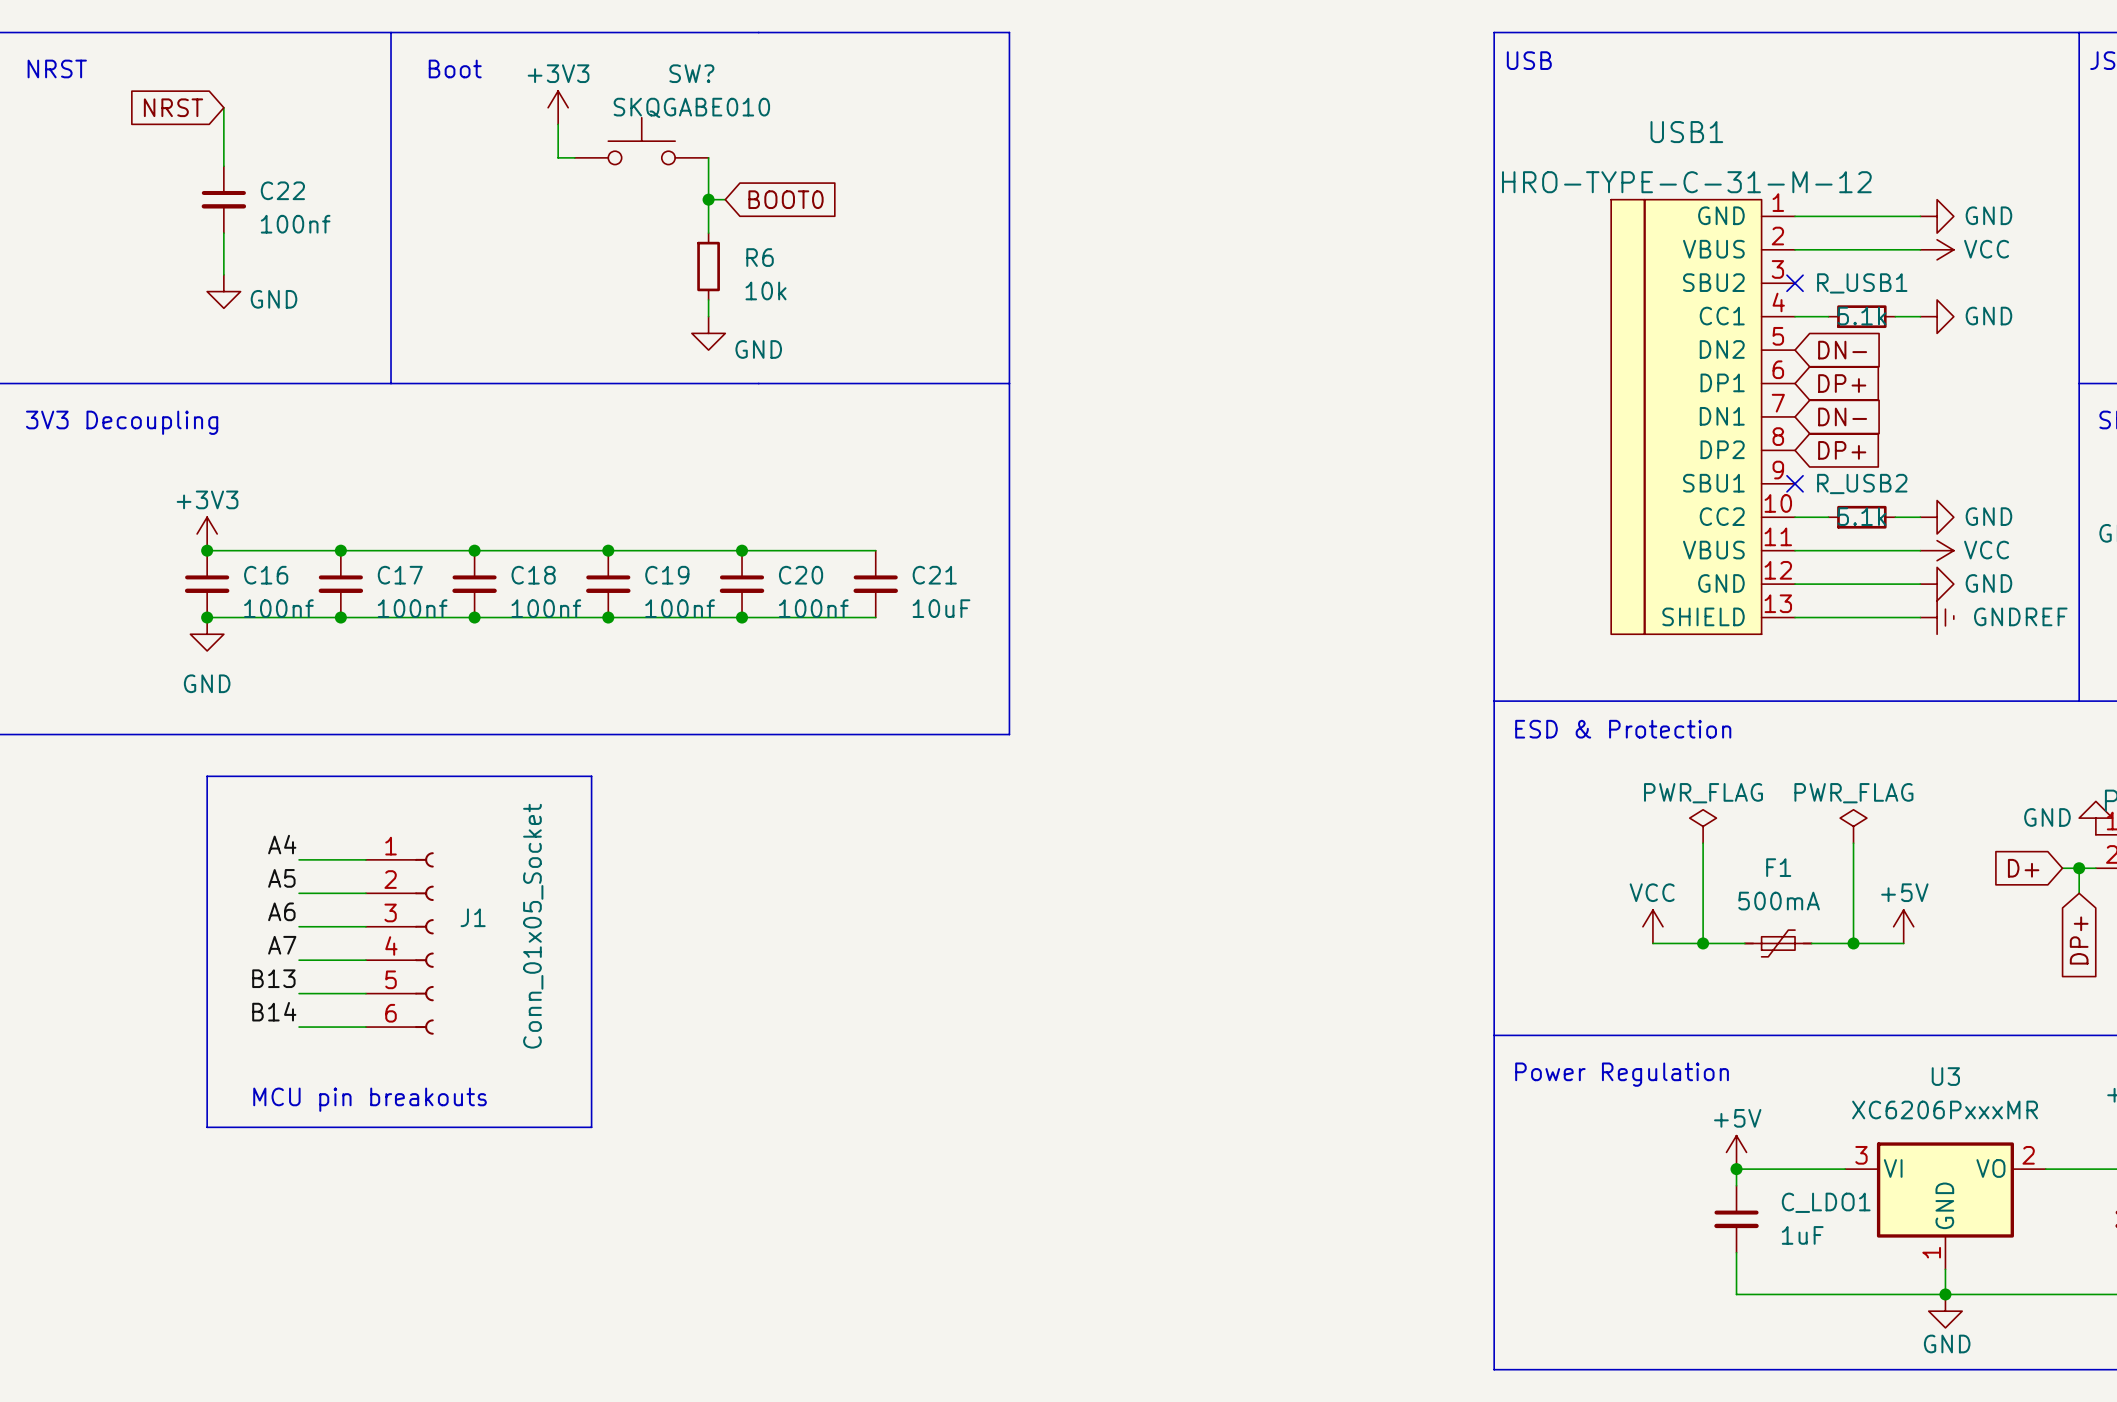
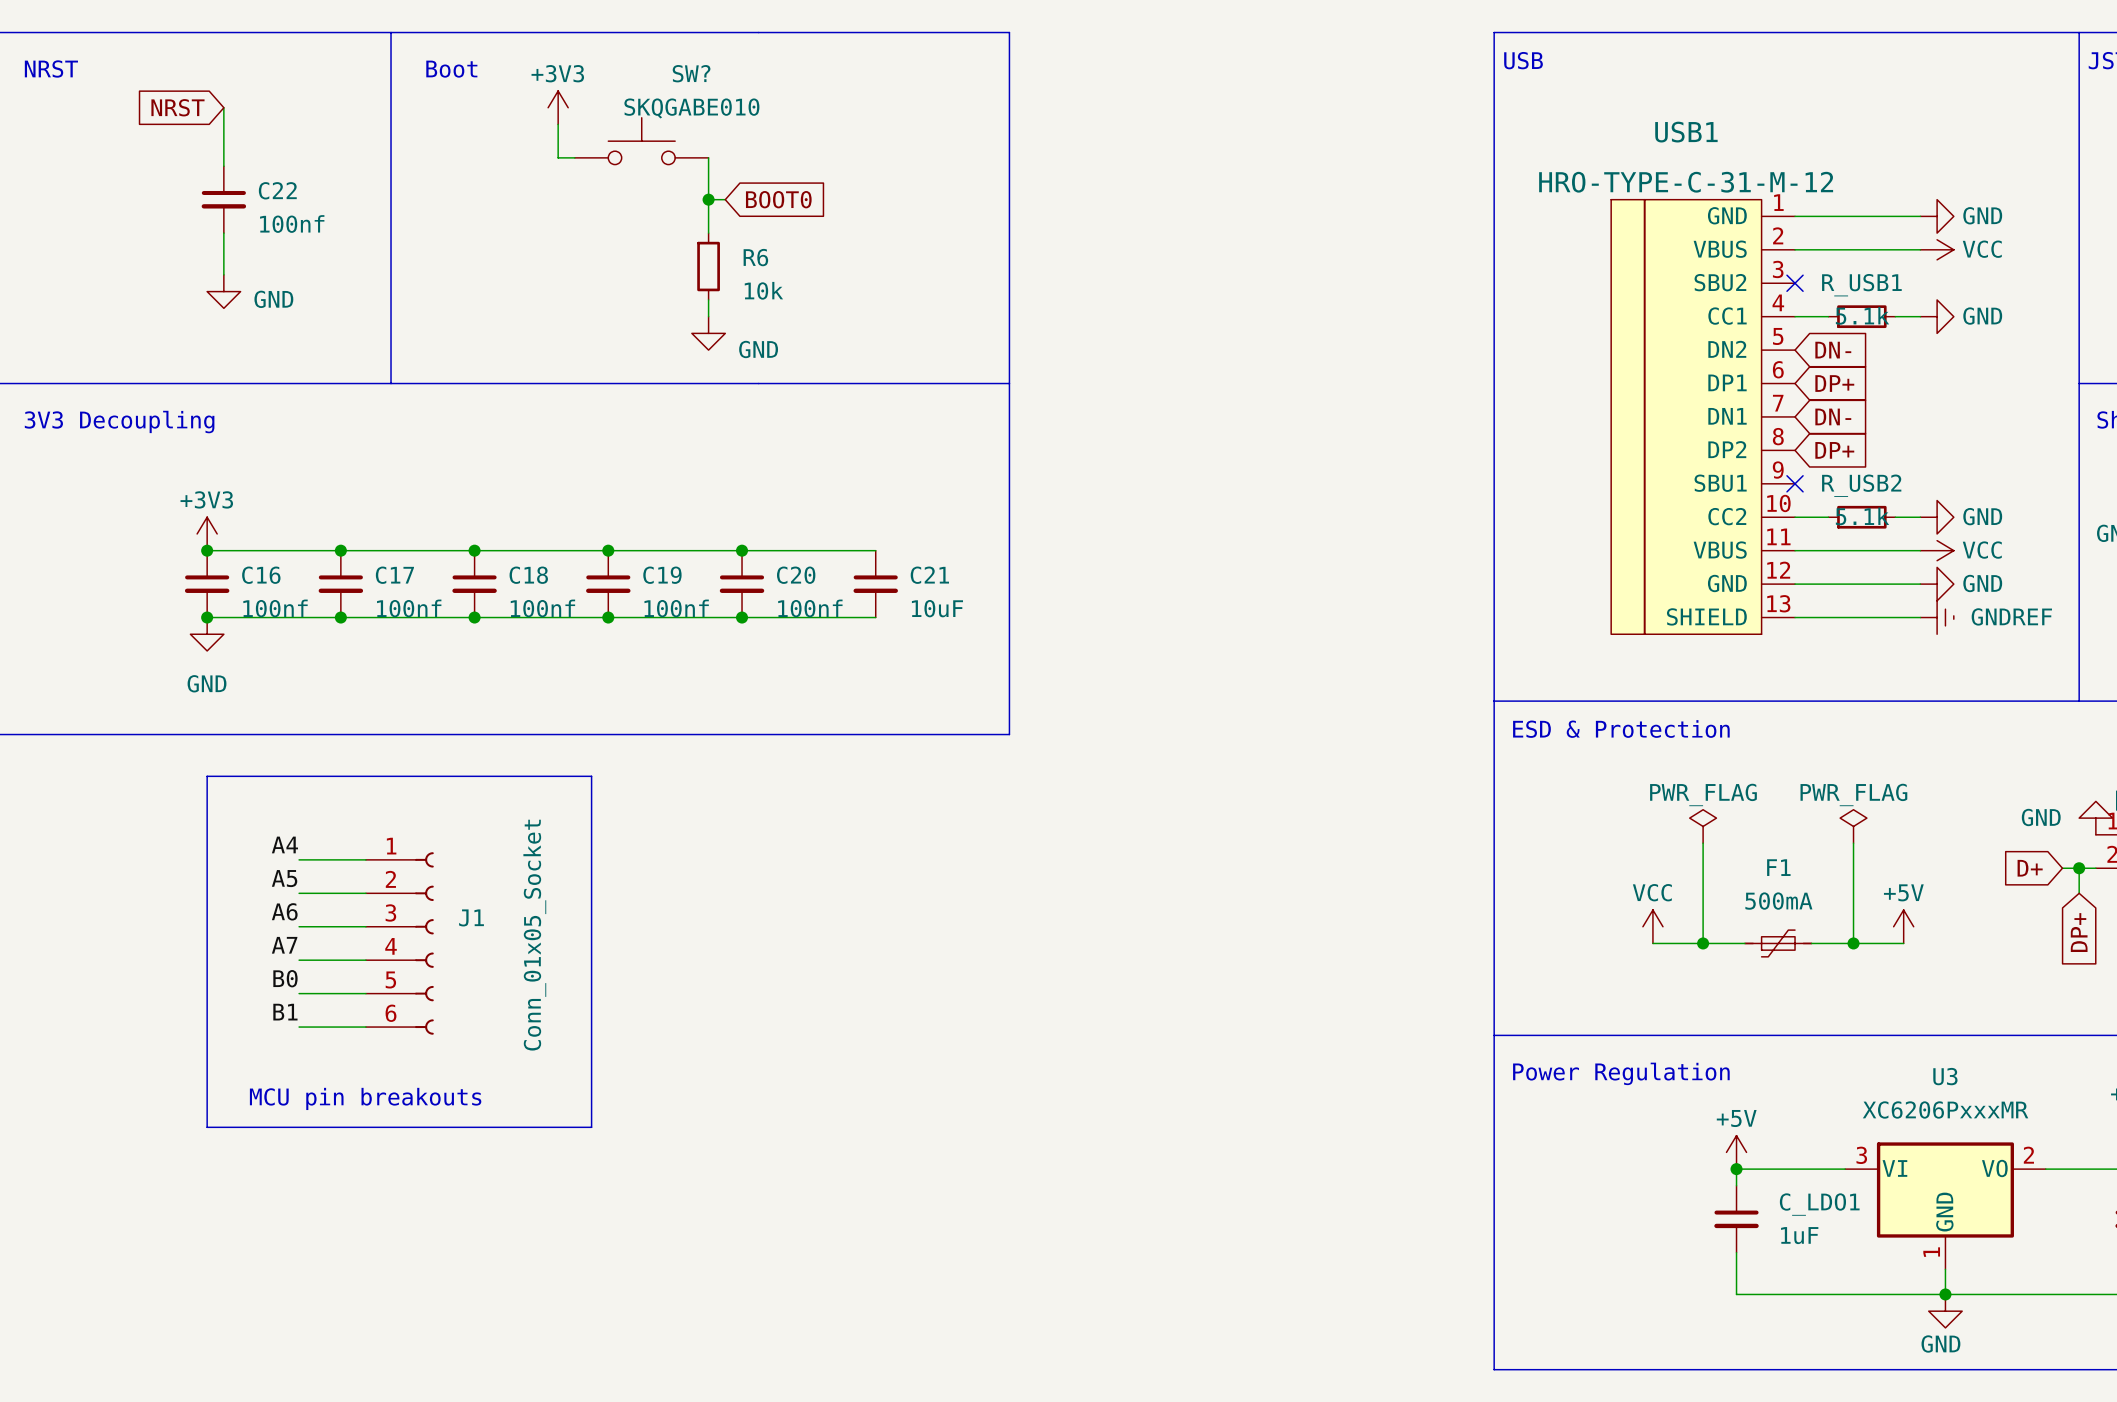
label: B13 (273, 978) -> B0 (285, 978)
label: B14 (274, 1011) -> B1 (285, 1012)

